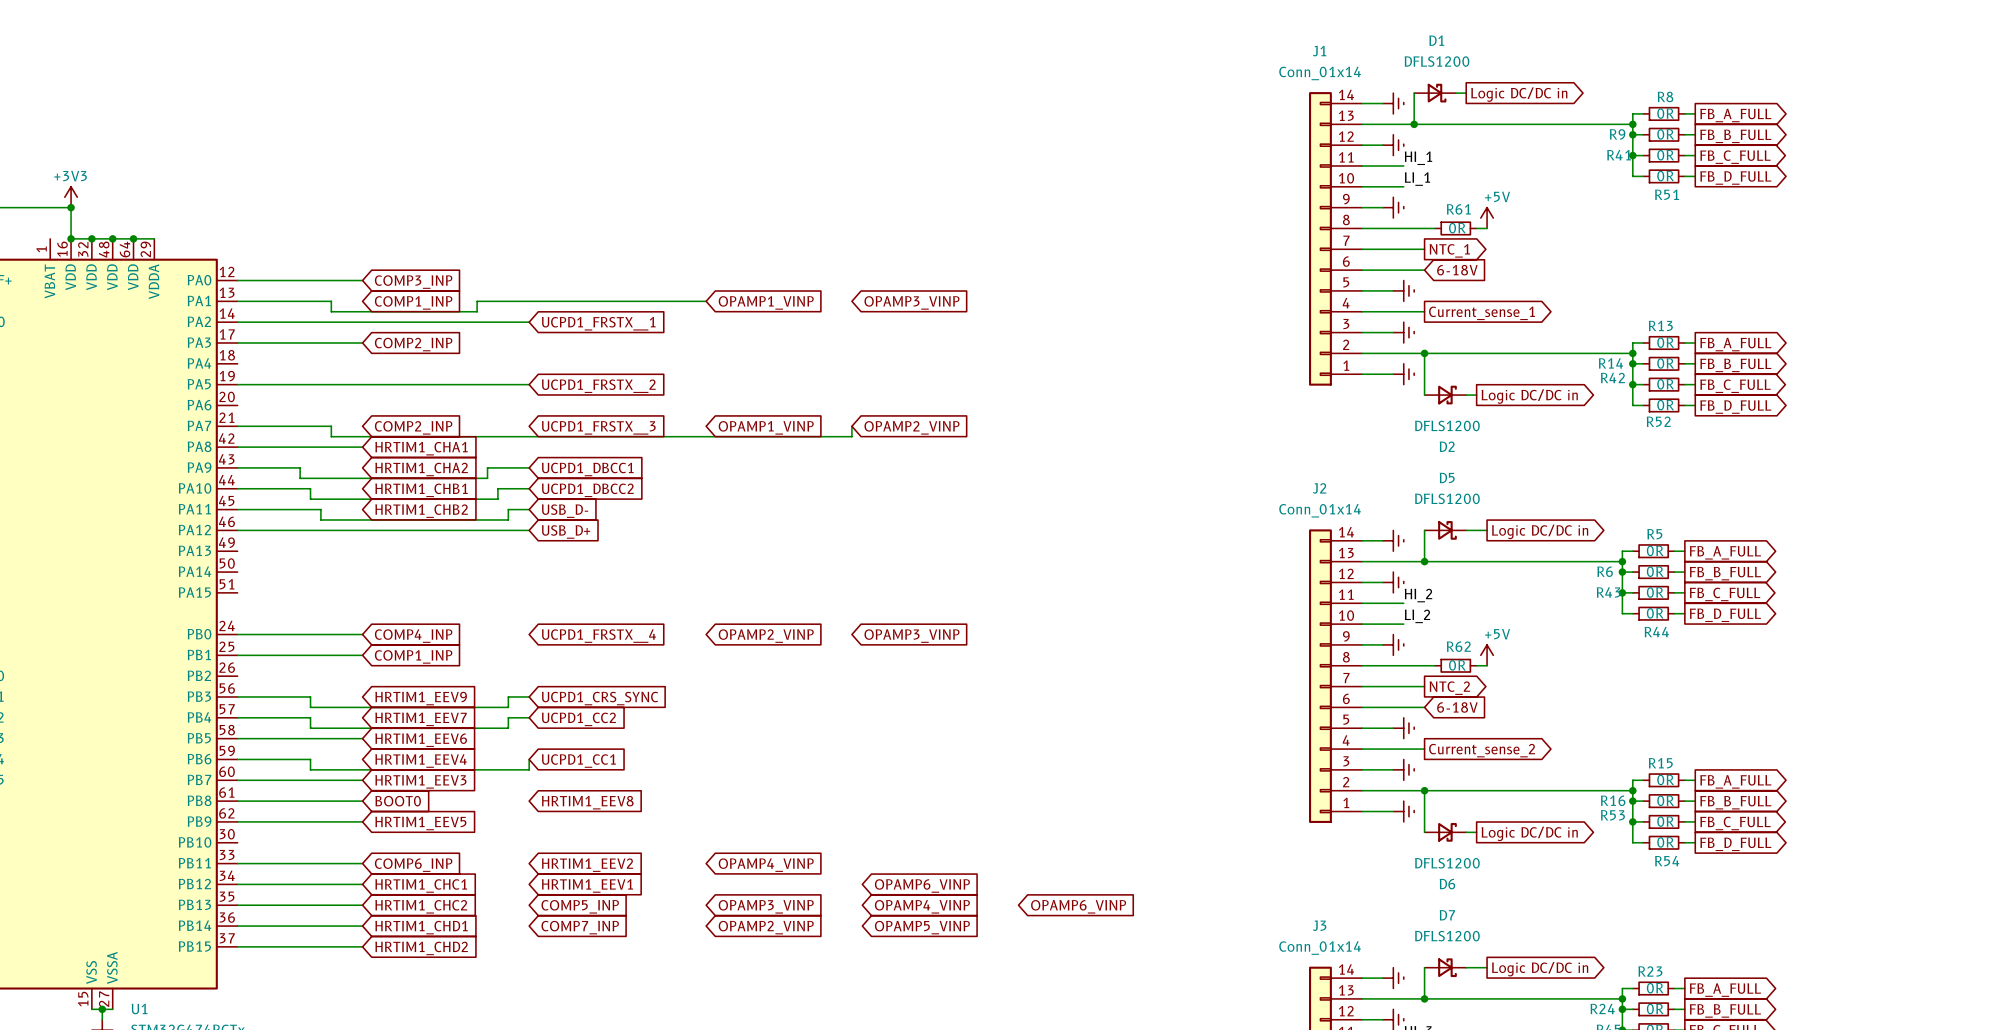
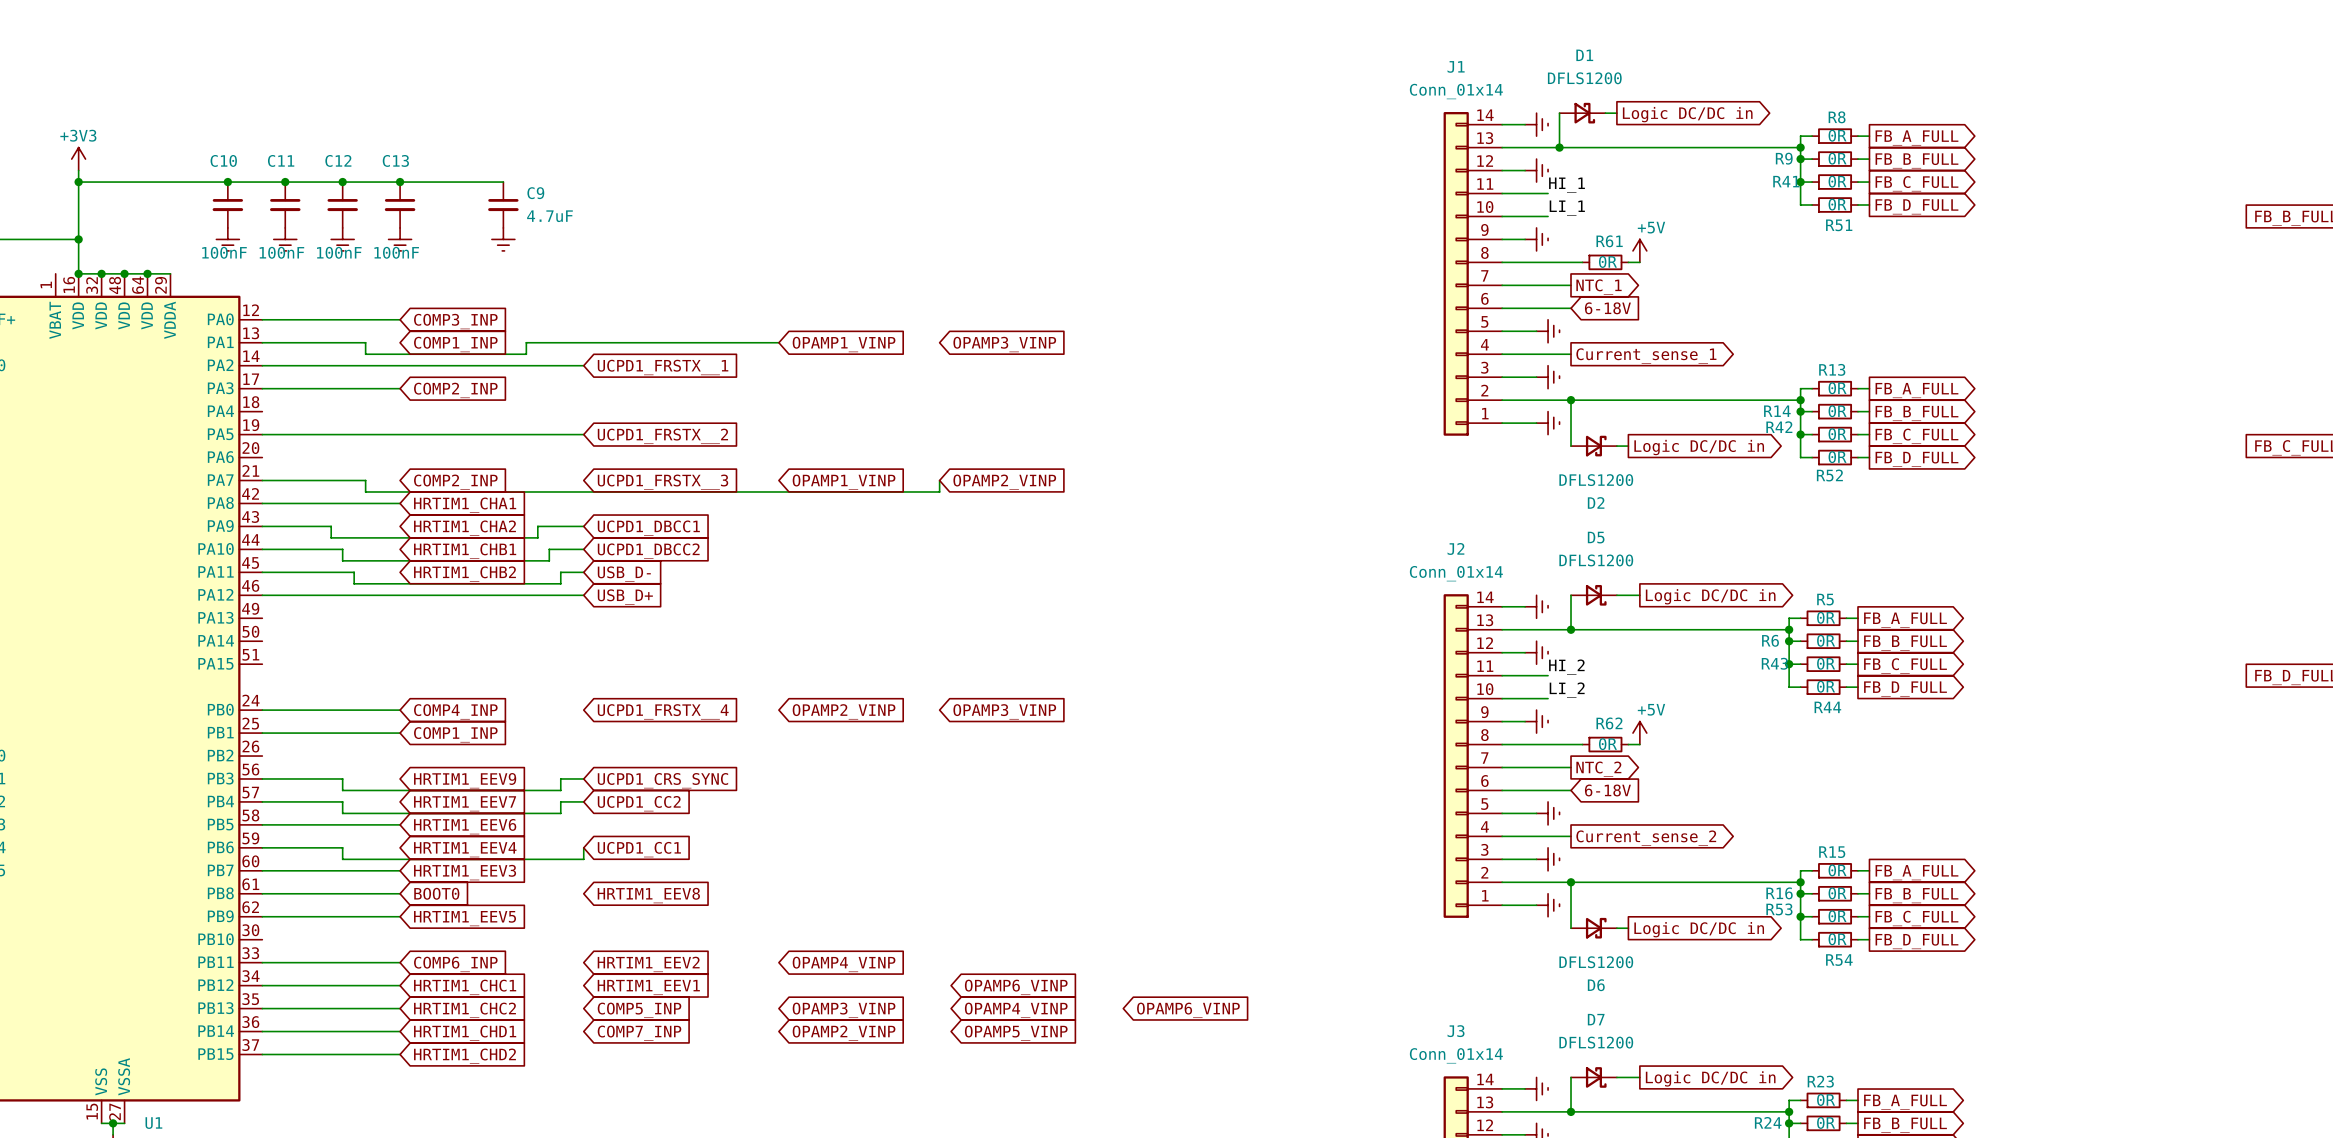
wire: none -> (78, 170) (78, 239)
wire: none -> (78, 182) (503, 182)
junction: none -> (78, 182)
junction: none -> (227, 182)
junction: none -> (285, 182)
junction: none -> (342, 182)
junction: none -> (400, 182)
C10: none -> 100nF (227, 204)
C11: none -> 100nF (285, 204)
C12: none -> 100nF (342, 204)
C13: none -> 100nF (400, 204)
C9: none -> 4.7uF (503, 204)
power symbol position: +3V3 (71, 197) -> +3V3 (78, 159)
power symbol: none -> (227, 239)
power symbol: none -> (285, 239)
power symbol: none -> (342, 239)
power symbol: none -> (400, 239)
power symbol: none -> (503, 239)

